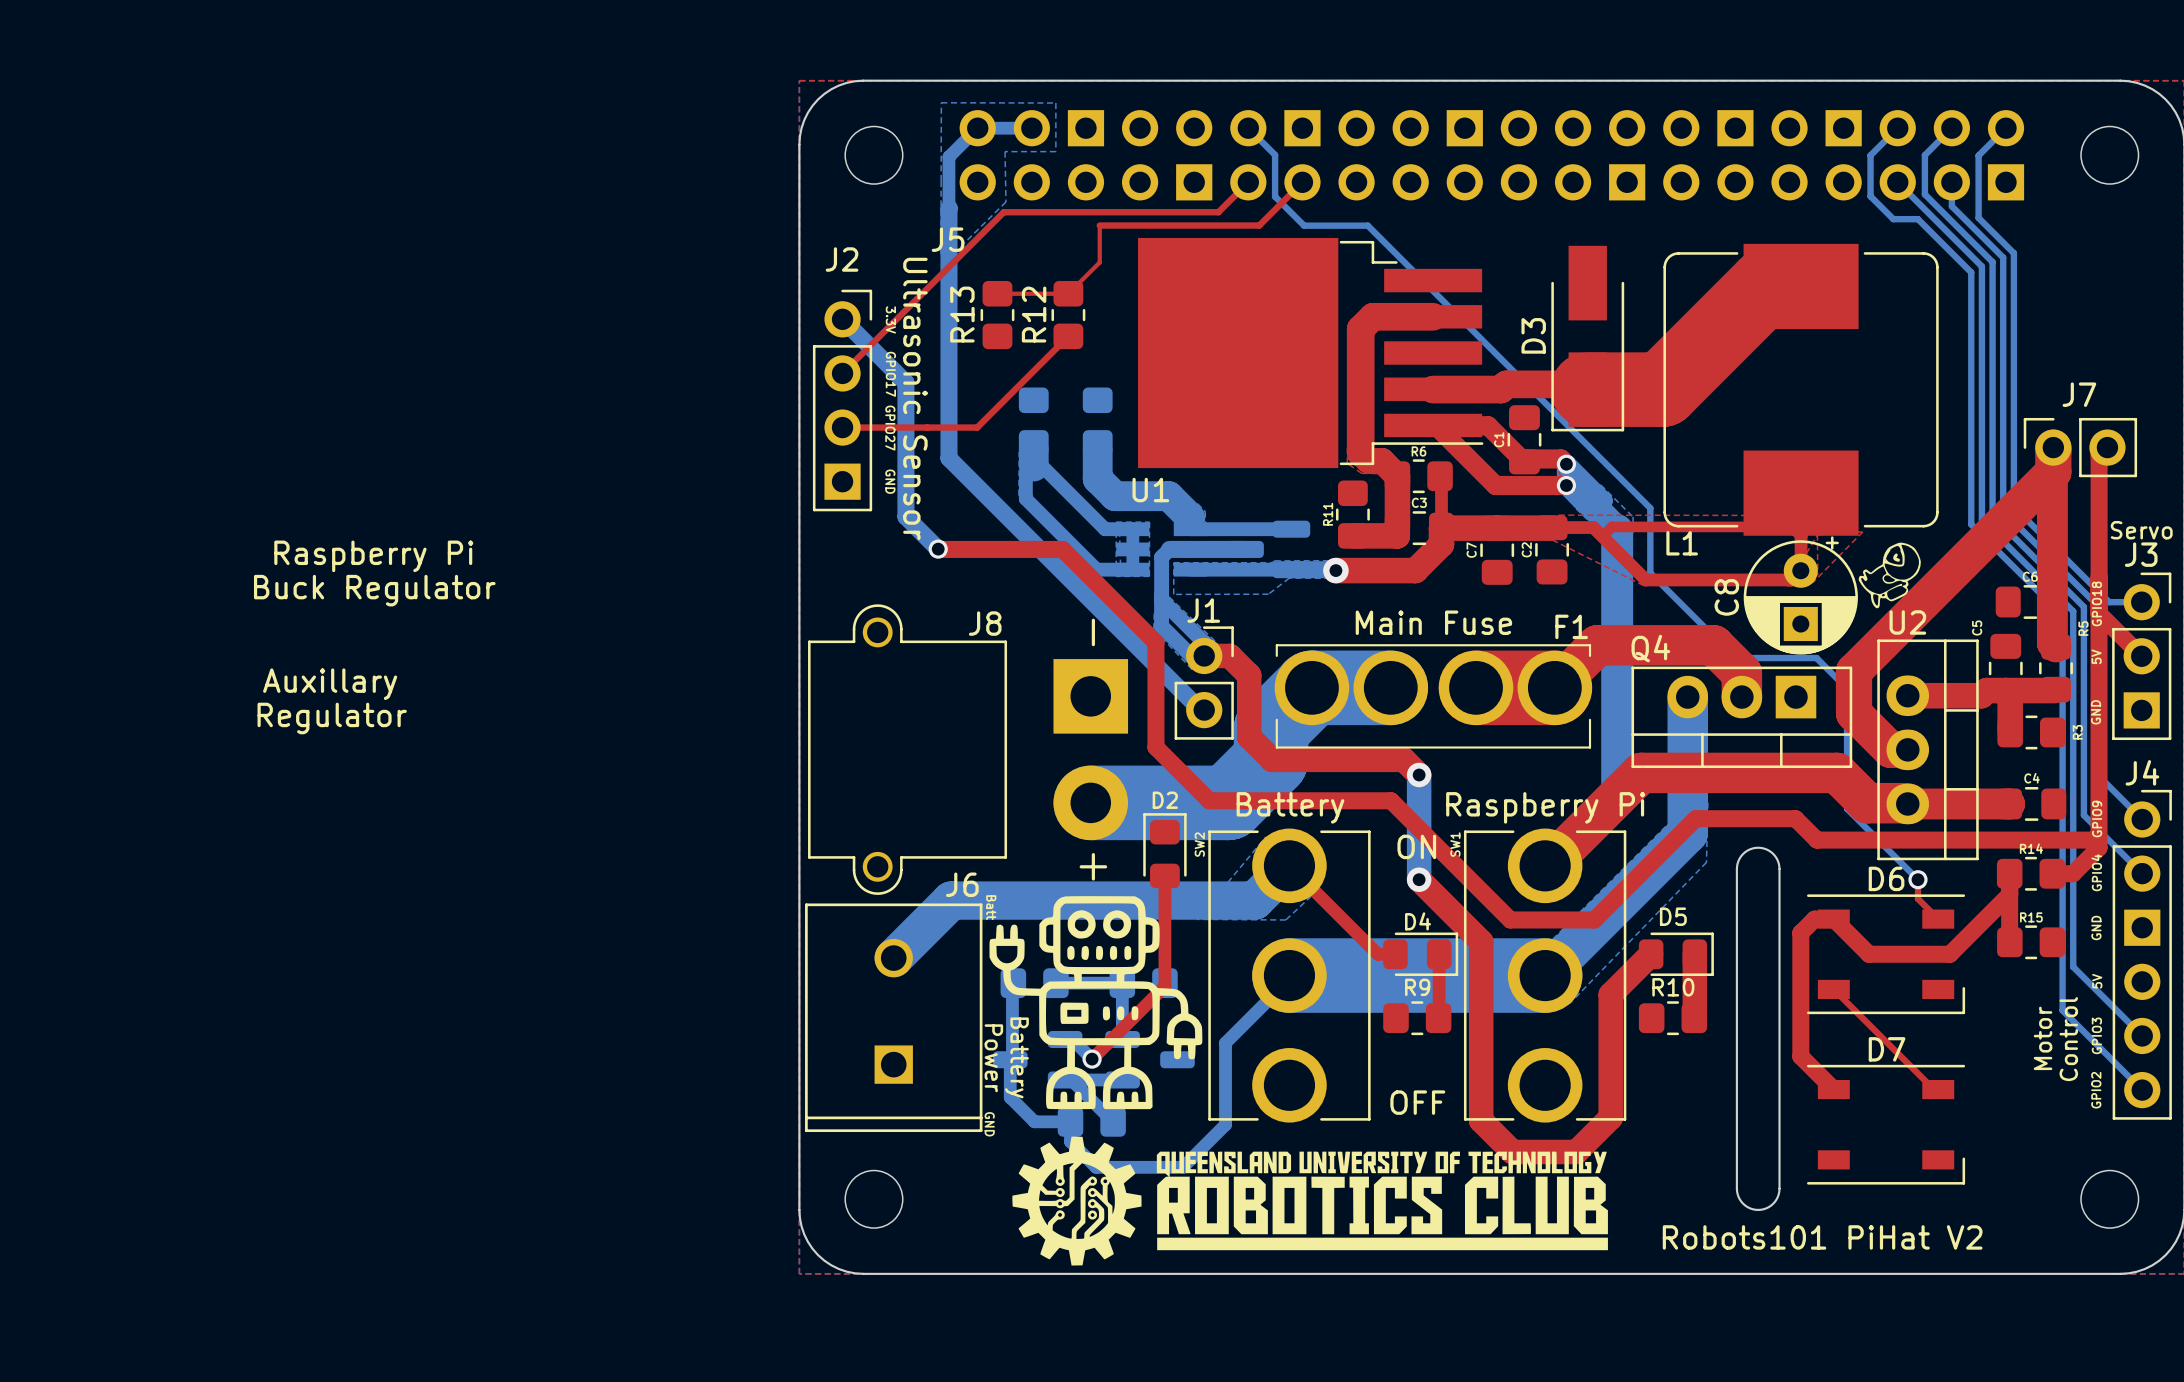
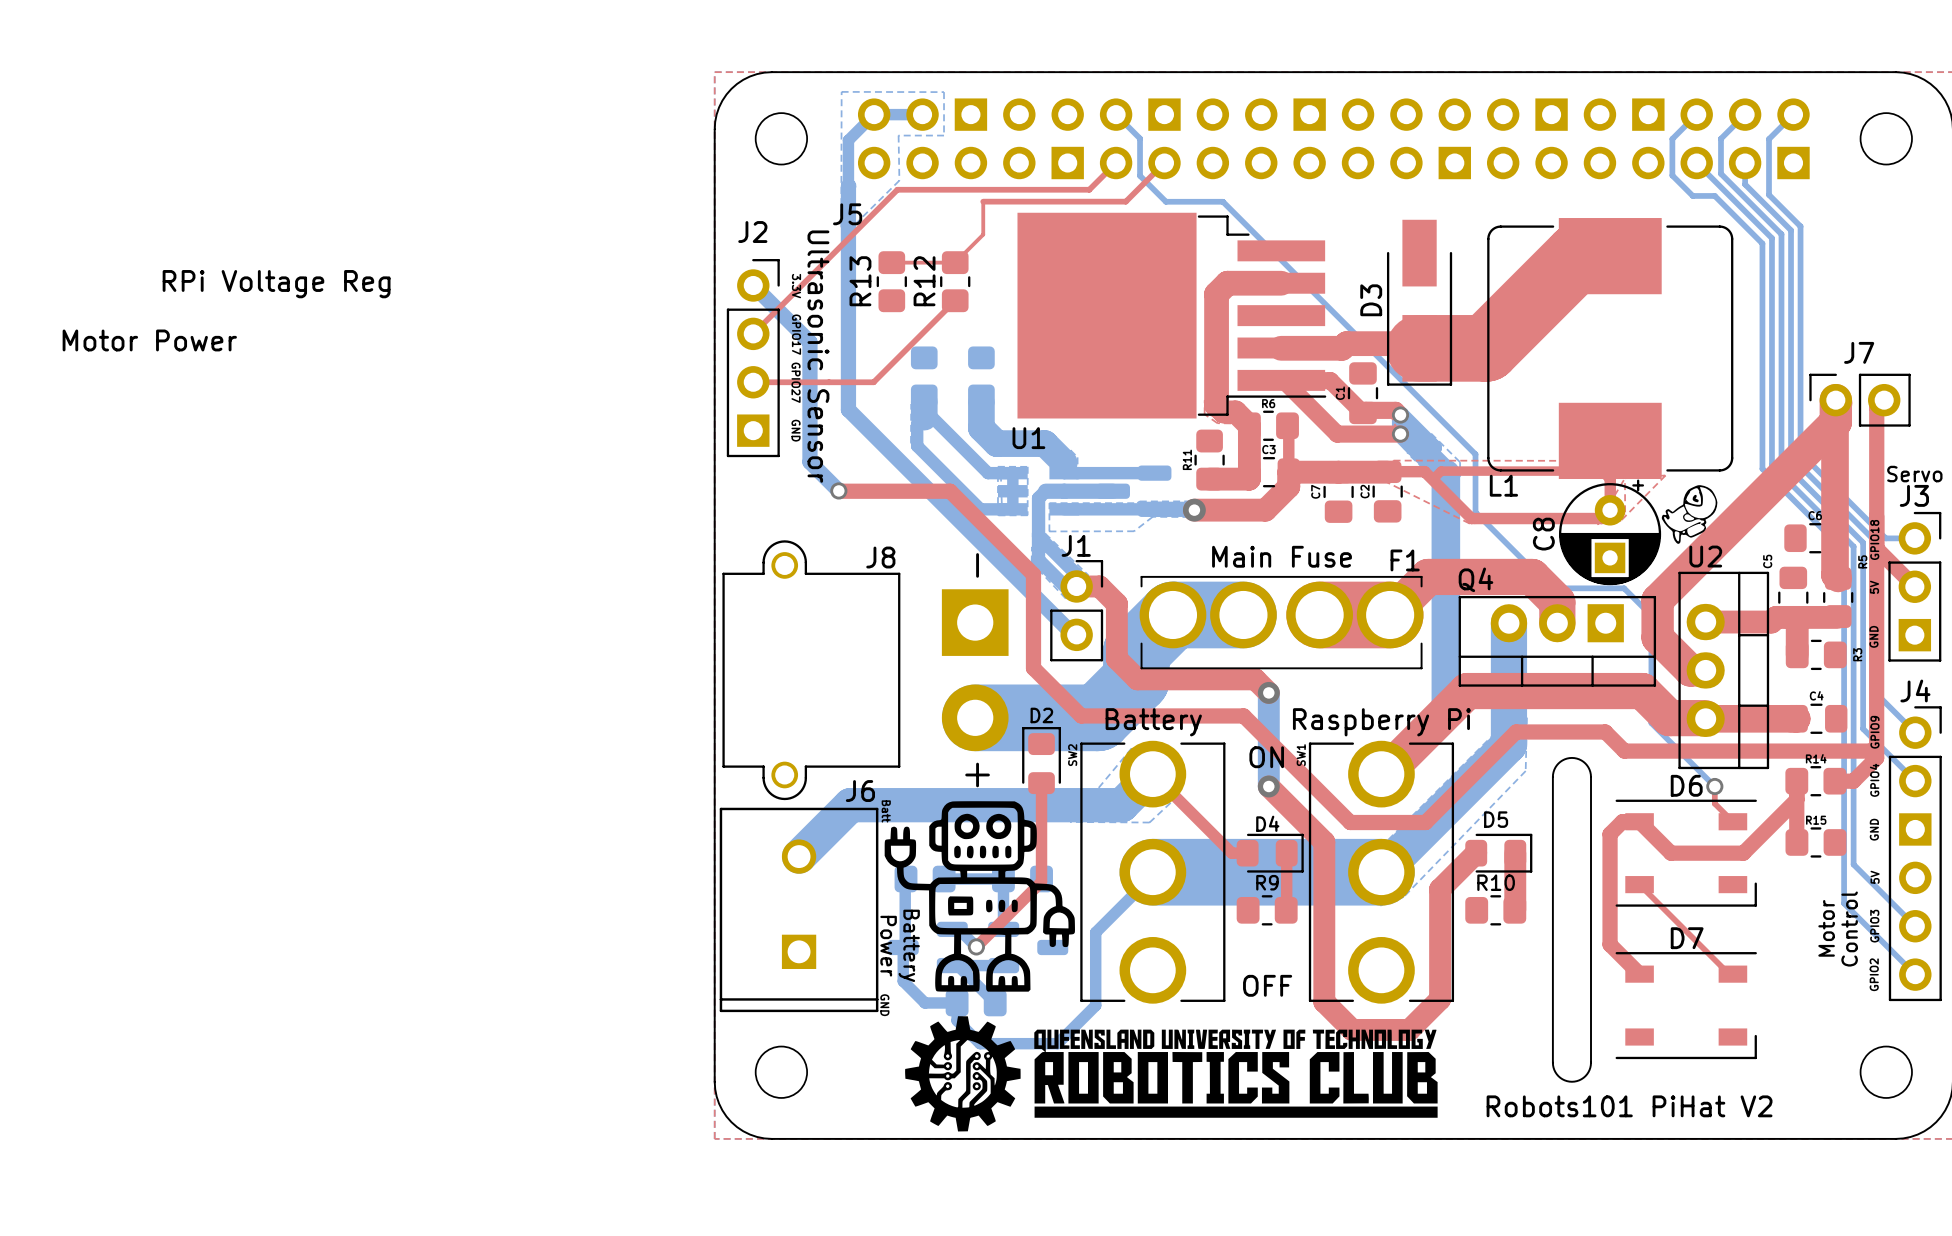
text: none -> RPi Voltage Reg (276, 284)
text: none -> Motor Power (149, 340)
text: Raspberry Pi (373, 556) -> none
text: Buck Regulator (374, 590) -> none
text: Auxillary (330, 684) -> none
text: Regulator (332, 718) -> none

